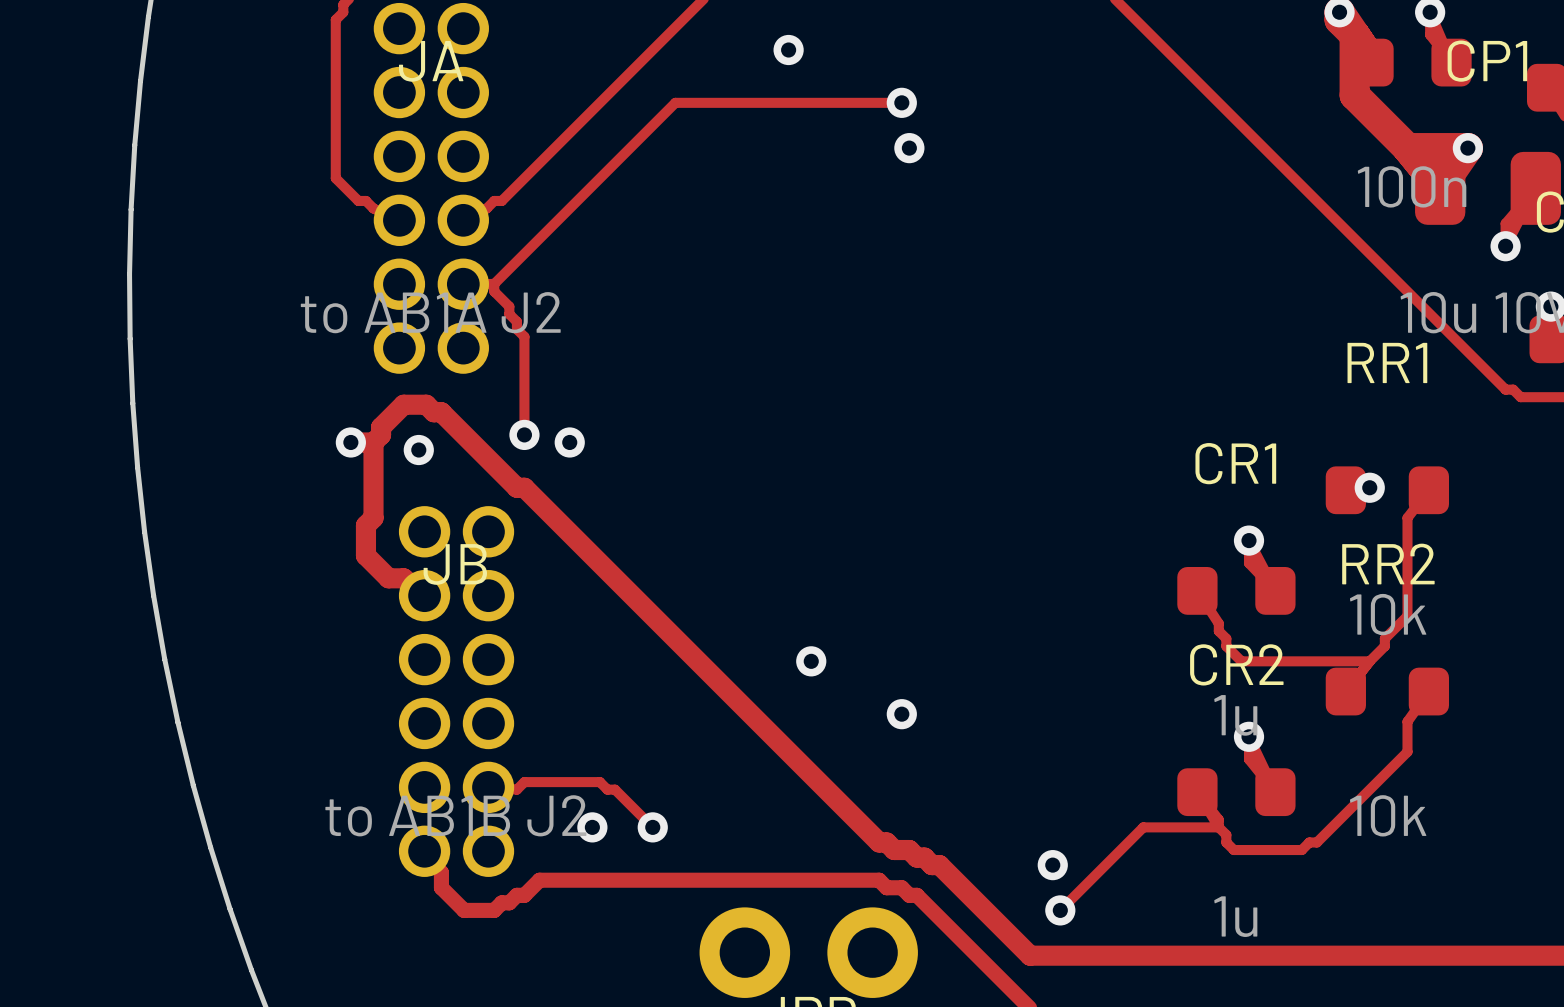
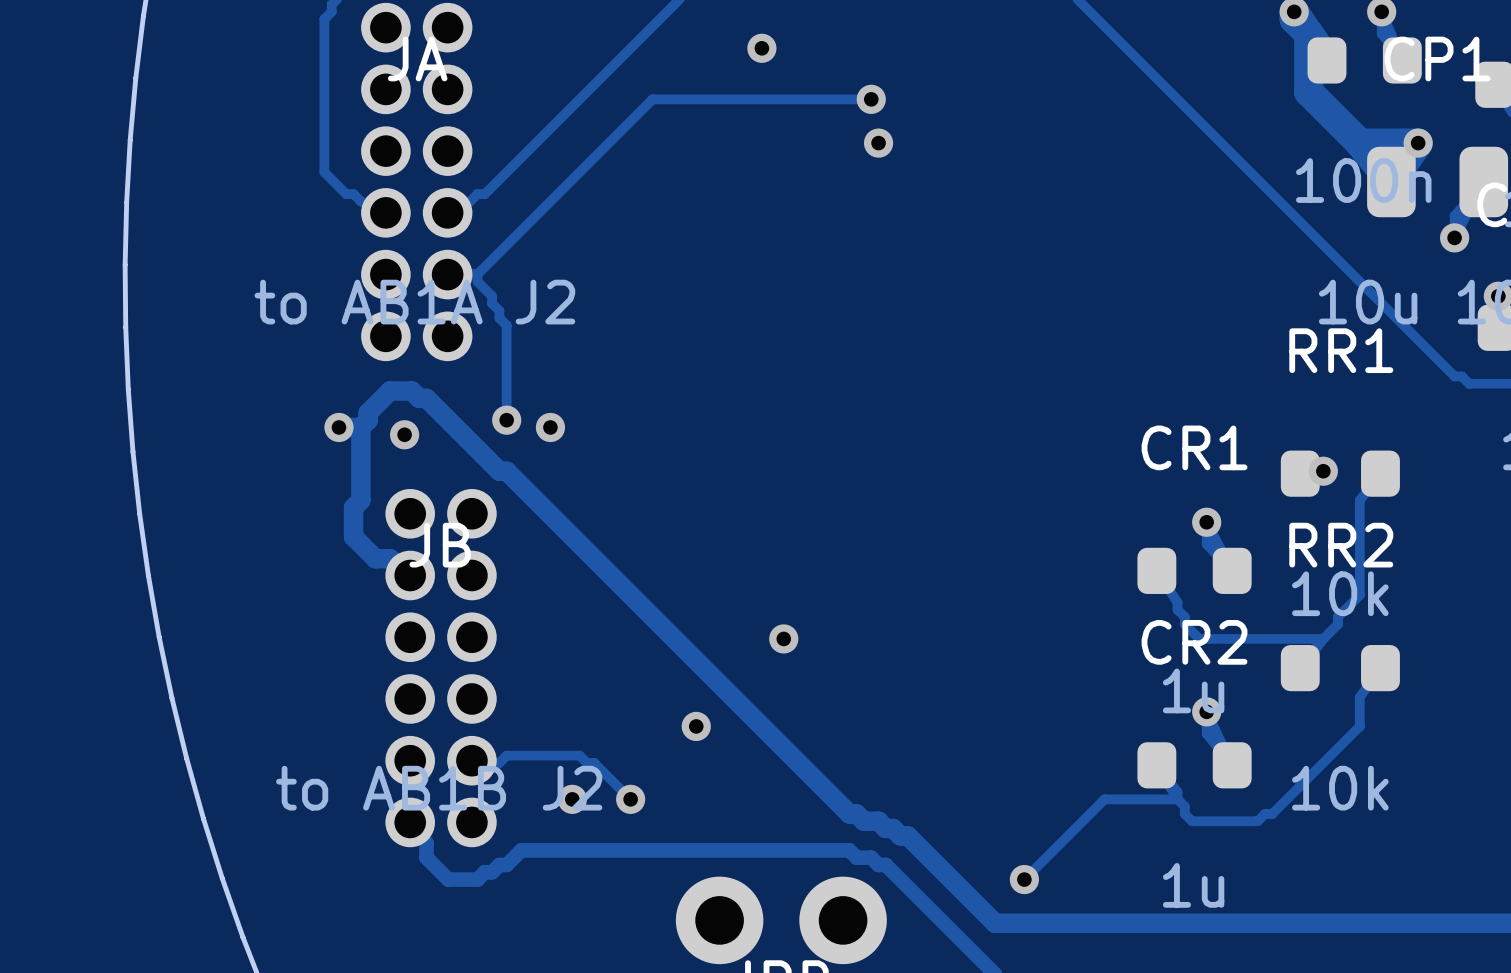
via: (901, 714) -> none
via: none -> (696, 726)
via: (1052, 865) -> none

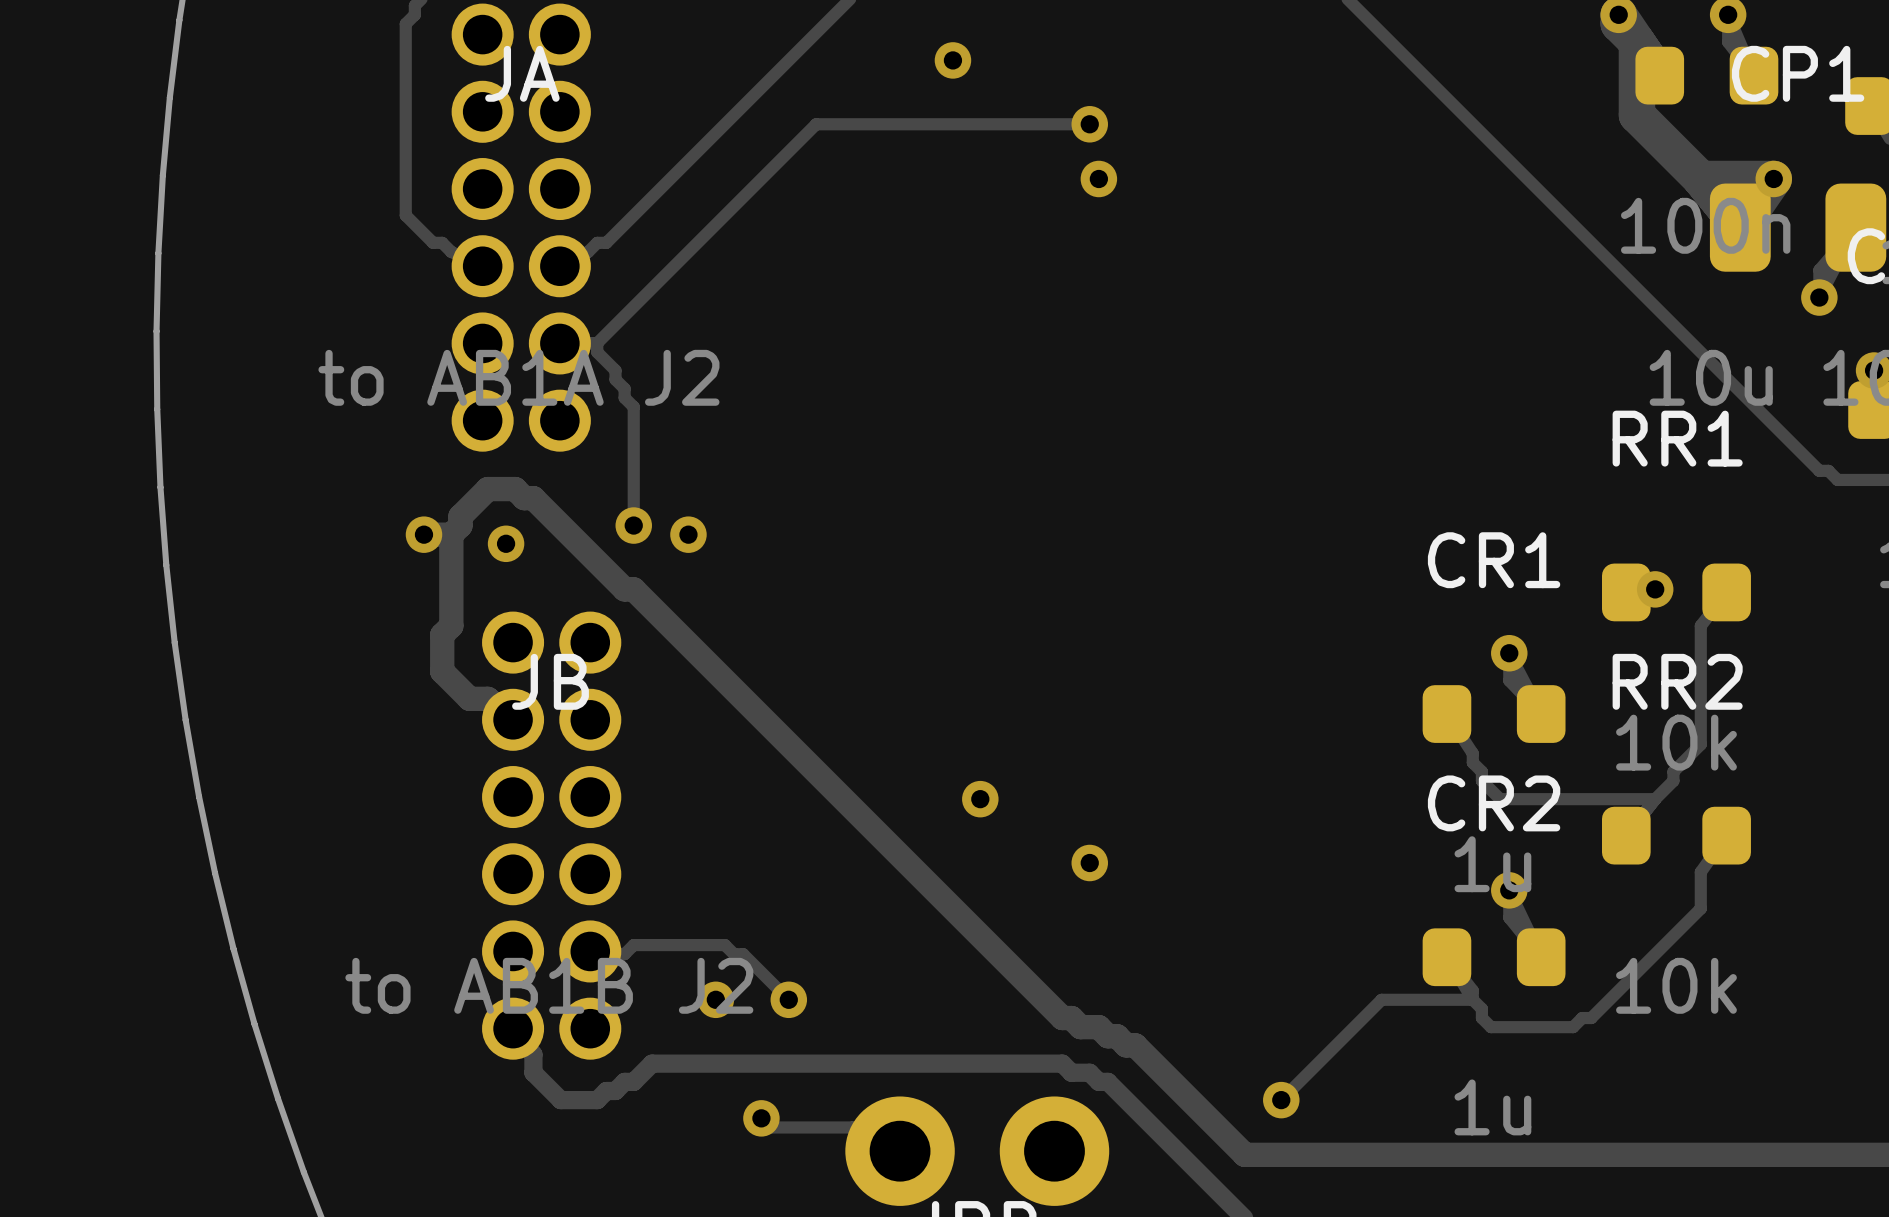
via: none -> (1089, 862)
via: (696, 726) -> none
track: none -> (761, 1118) (770, 1127) (852, 1127) (900, 1151)
via: none -> (761, 1118)

